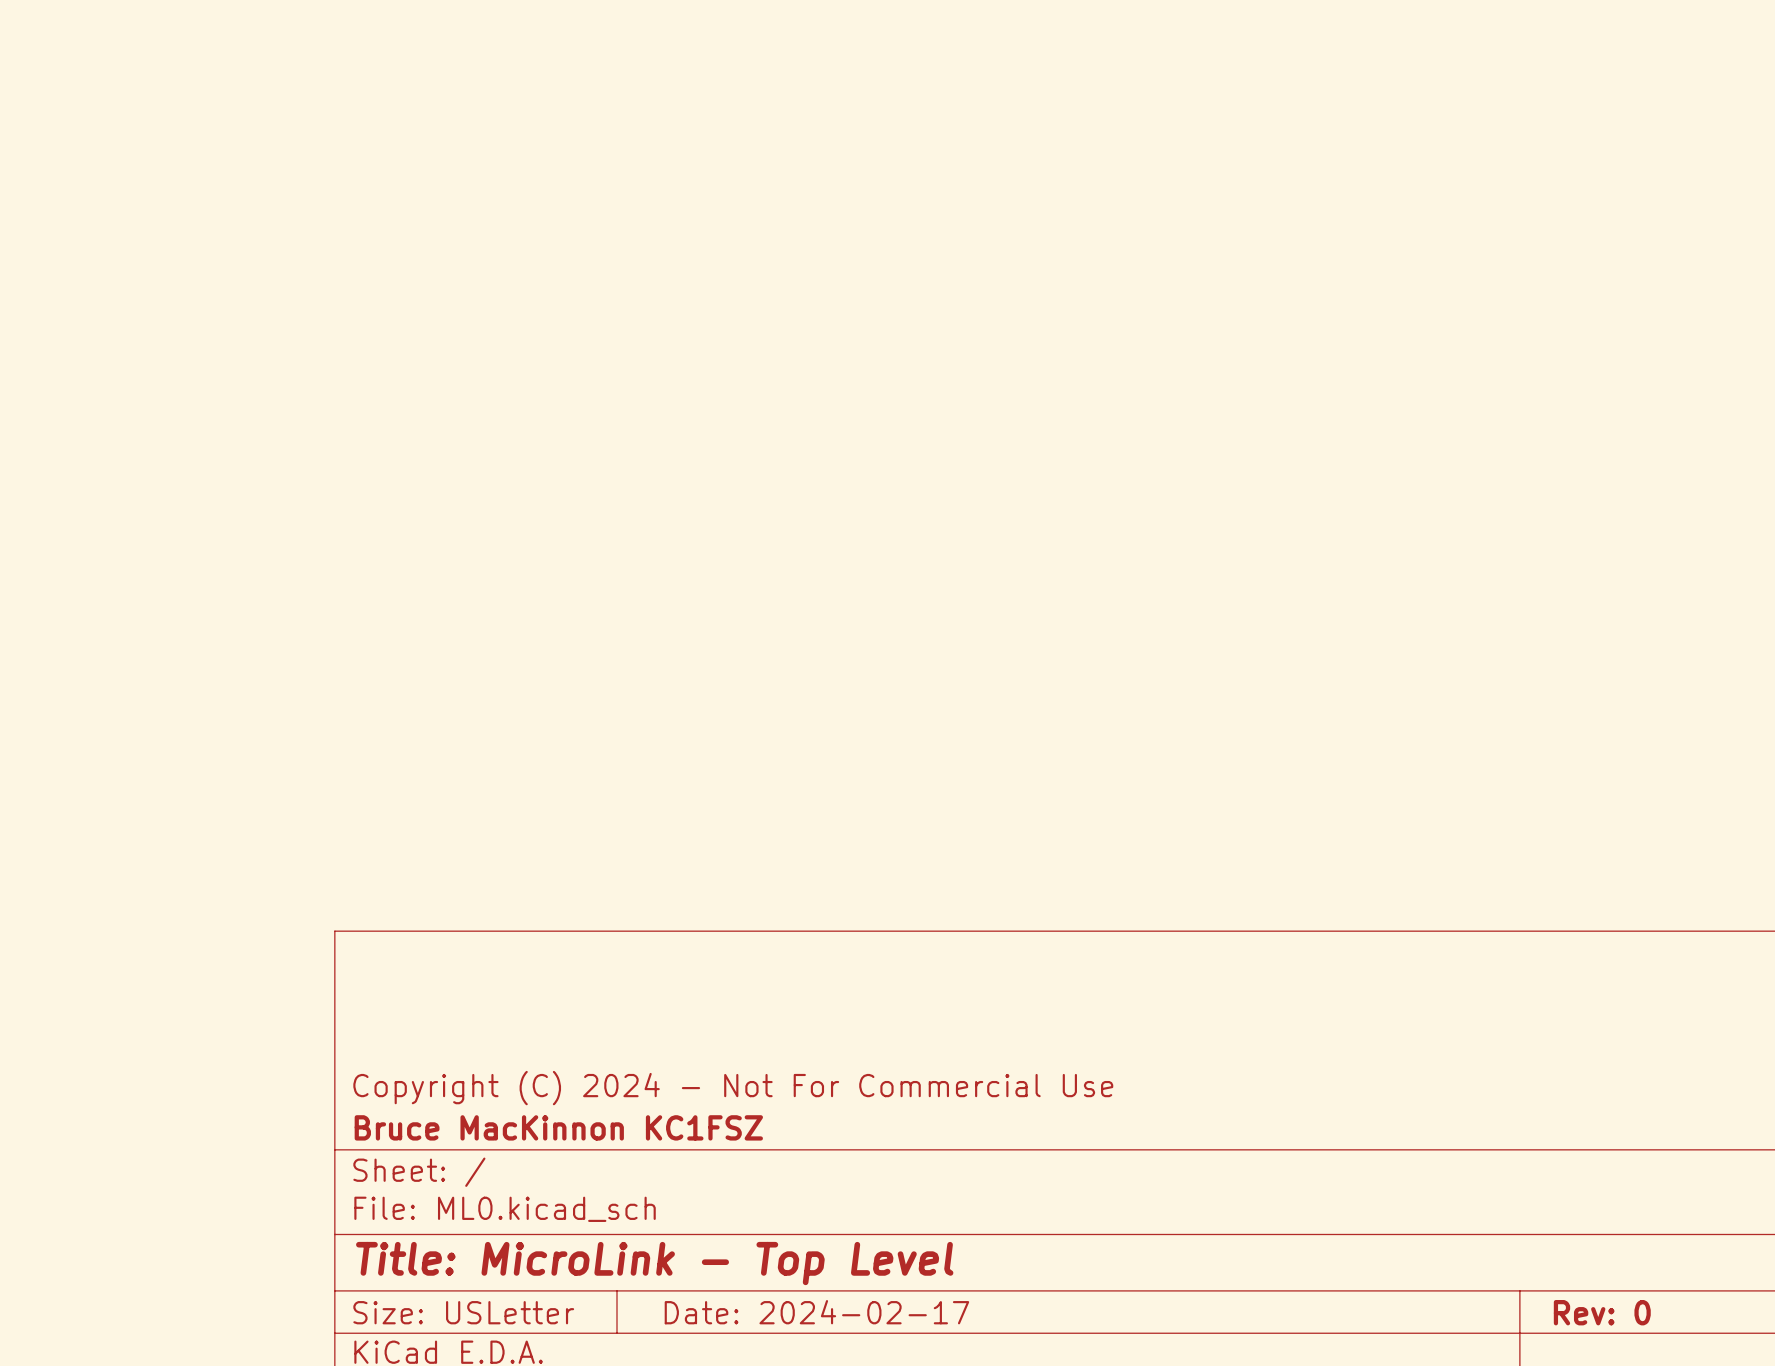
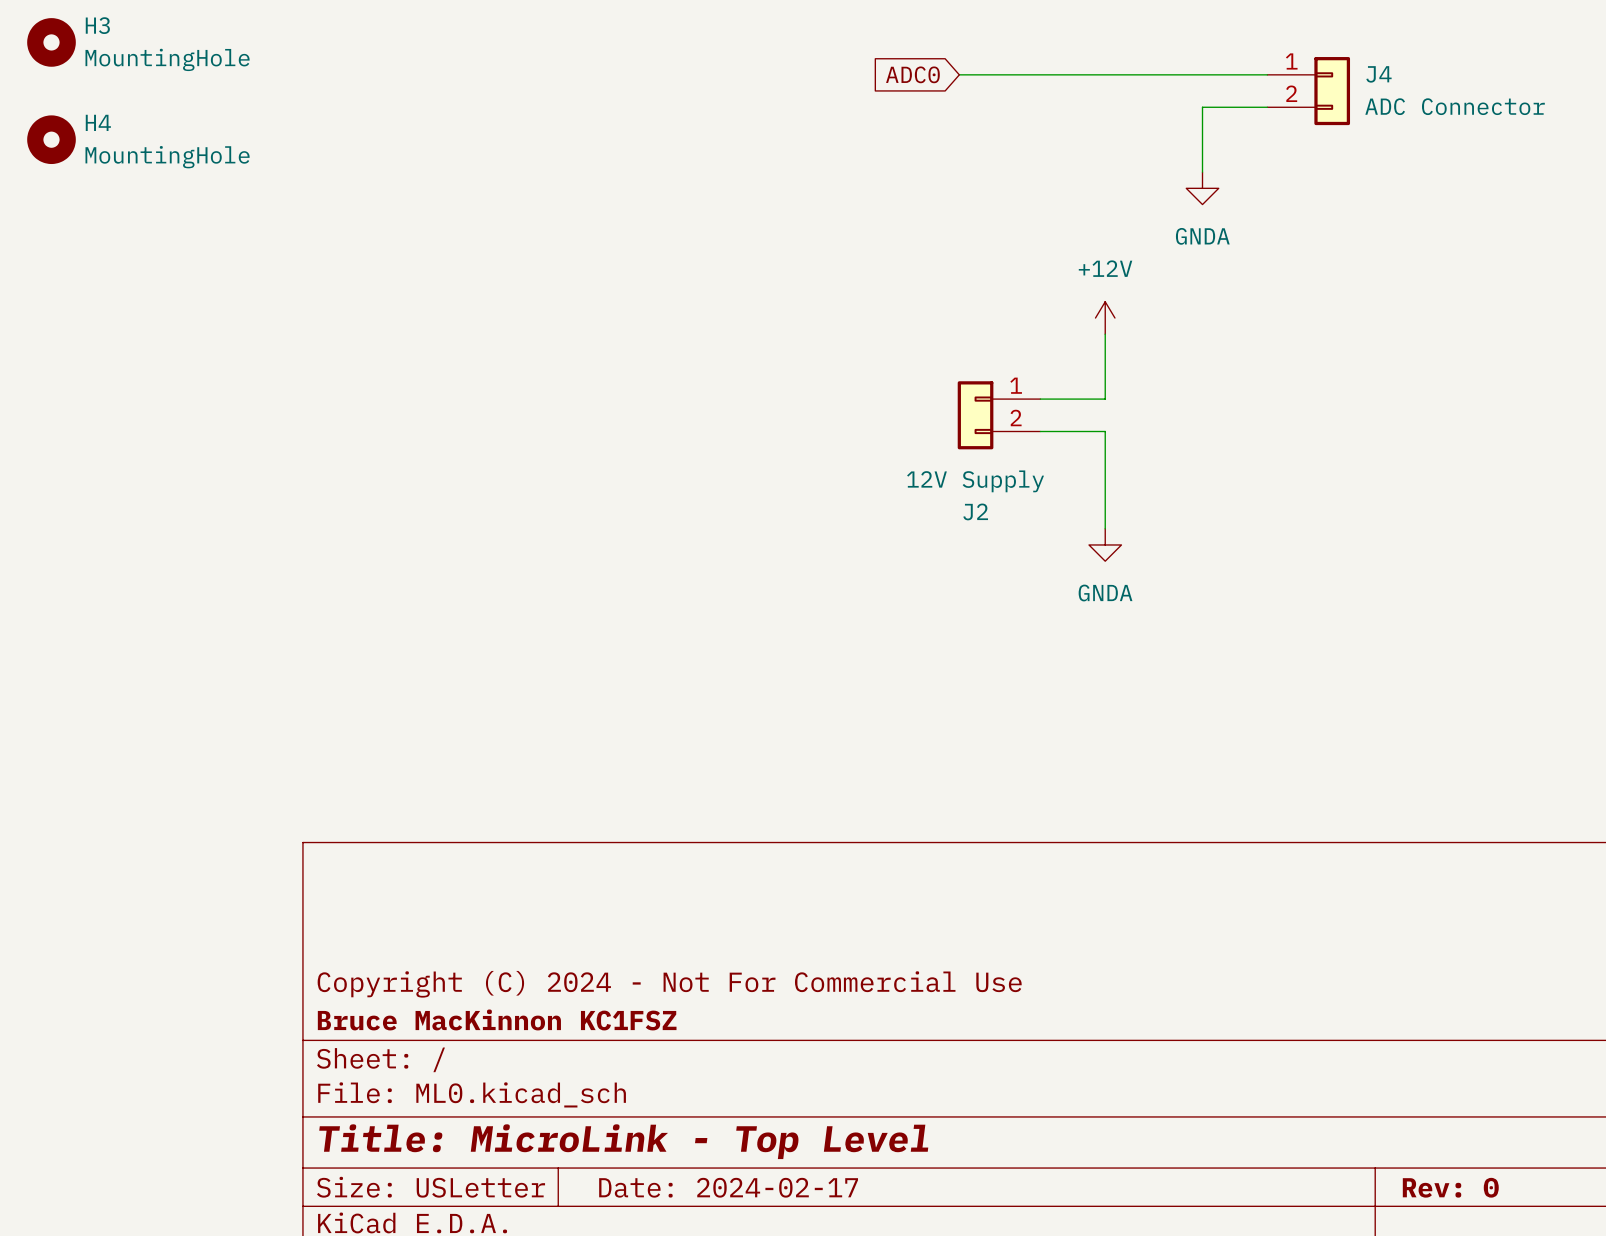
H3: none -> MountingHole (51, 42)
global label: none -> ADC0 (912, 74)
wire: none -> (959, 74) (1267, 74)
J4: none -> ADC Connector (1308, 91)
wire: none -> (1267, 107) (1202, 107) (1202, 172)
H4: none -> MountingHole (51, 139)
power symbol: none -> GNDA (1202, 188)
power symbol: none -> +12V (1105, 318)
wire: none -> (1105, 334) (1105, 399) (1040, 399)
J2: none -> 12V Supply (999, 415)
wire: none -> (1040, 431) (1105, 431) (1105, 528)
power symbol: none -> GNDA (1105, 544)

